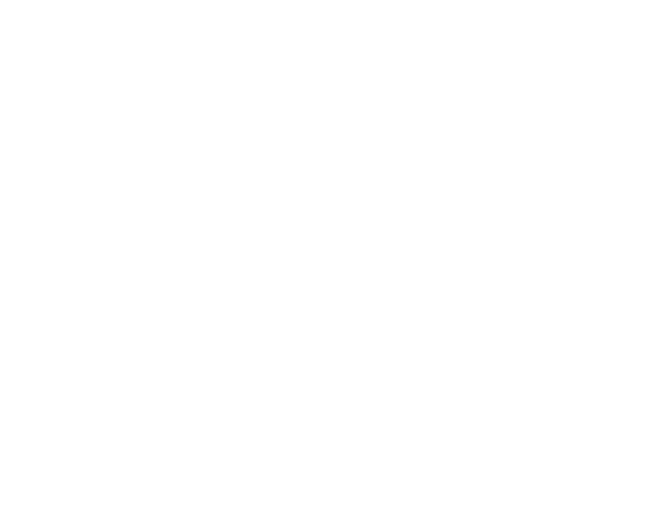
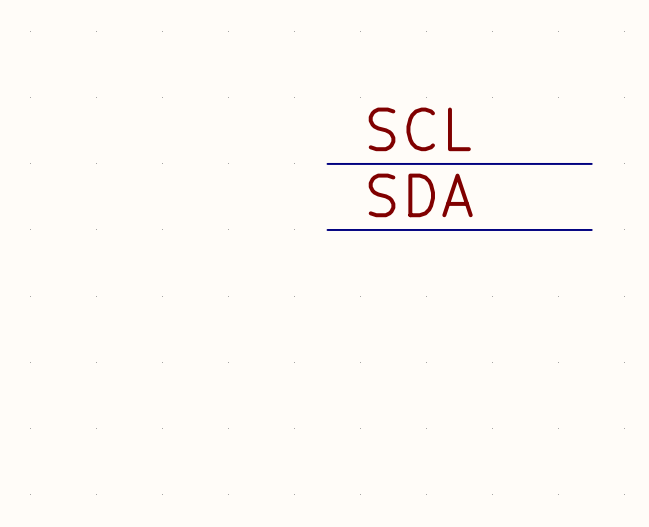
label: none -> SCL (419, 129)
wire: none -> (327, 163) (591, 163)
label: none -> SDA (420, 195)
wire: none -> (327, 229) (591, 229)

